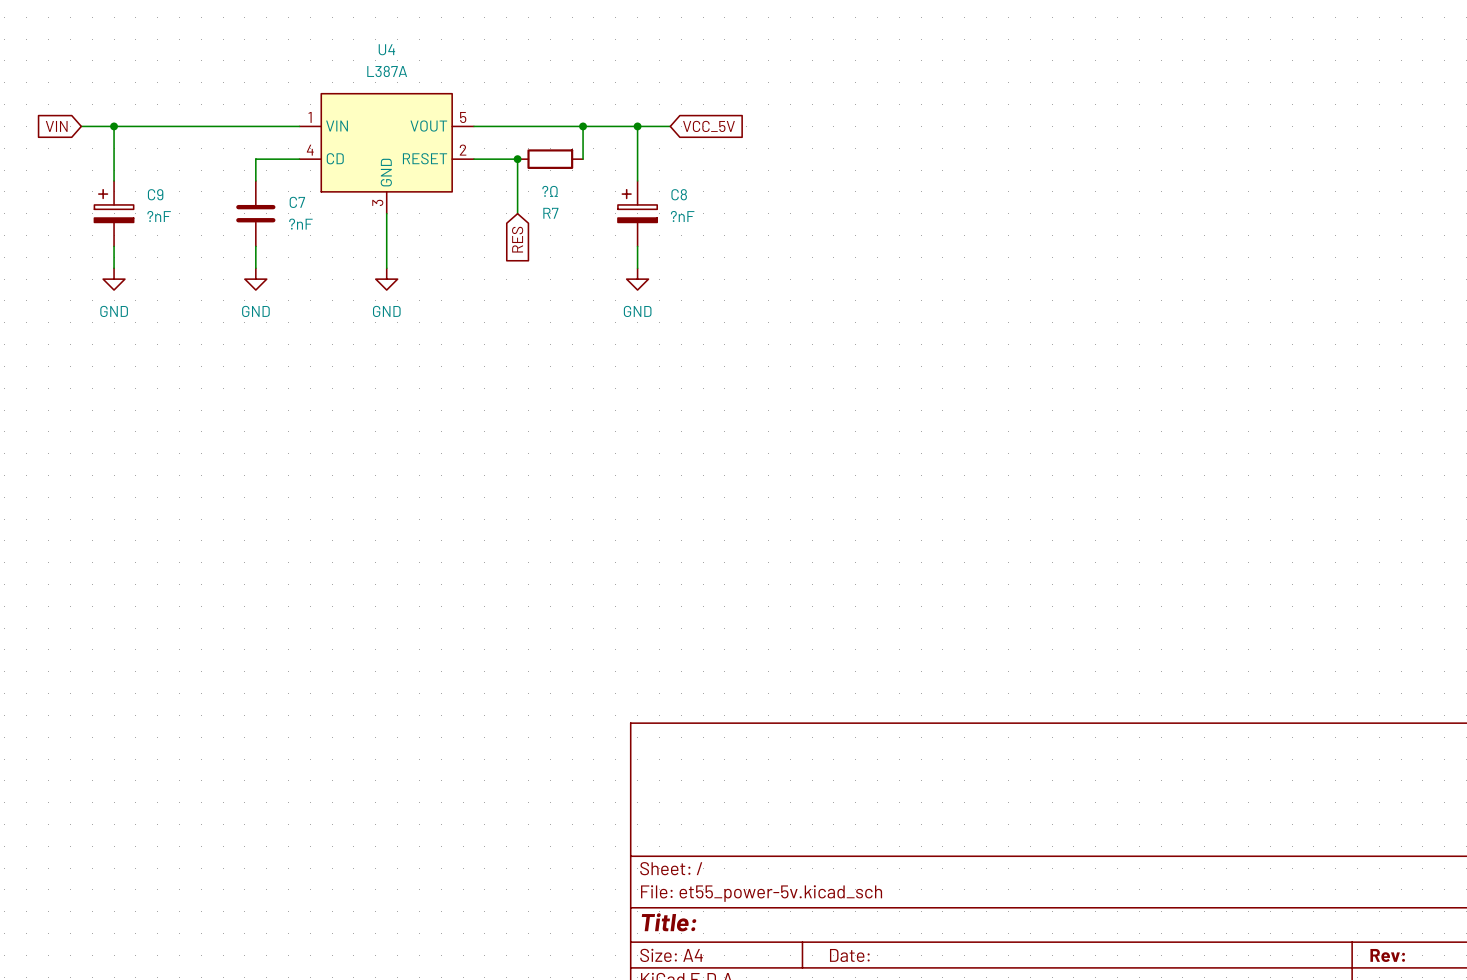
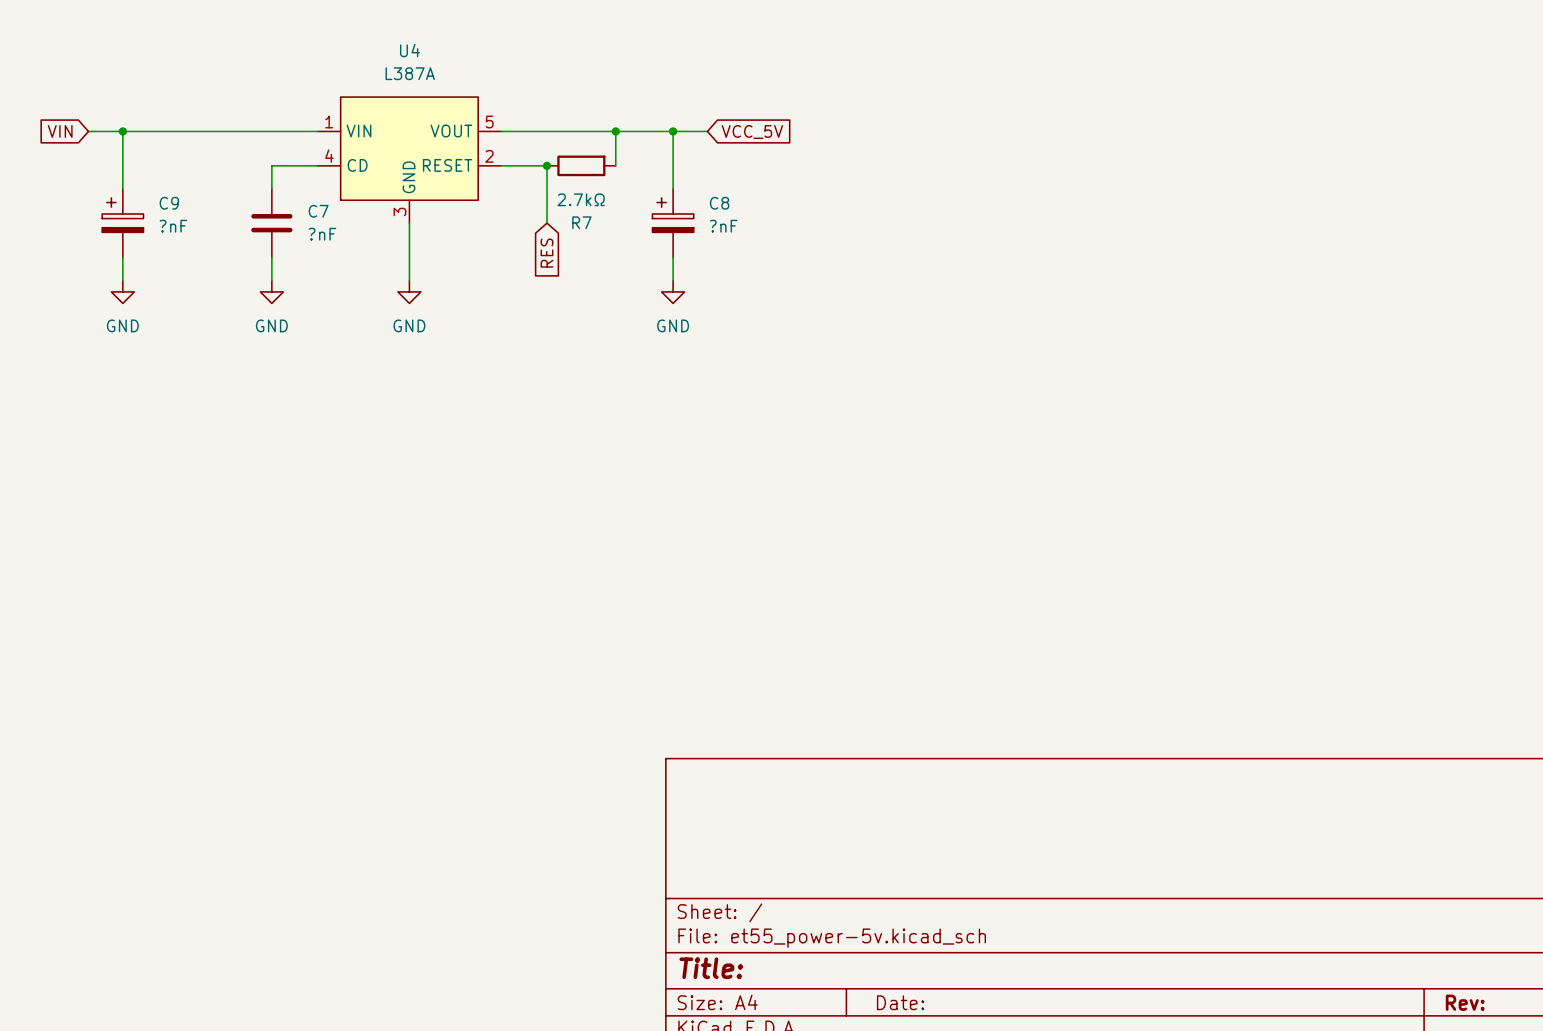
R7 value: ?Ω (550, 191) -> 2.7kΩ (581, 199)

